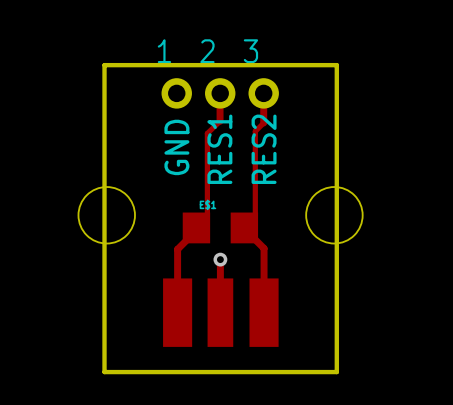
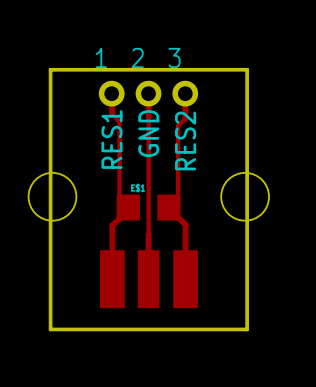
track: none -> (111, 93) (112, 114) (119, 121) (119, 206)
track: (220, 93) (220, 121) (207, 133) (207, 222) -> (148, 93) (148, 234)
text: GND (176, 147) -> RES1 (111, 139)
text: RES1 (219, 149) -> GND (148, 133)
via: (220, 259) -> none

